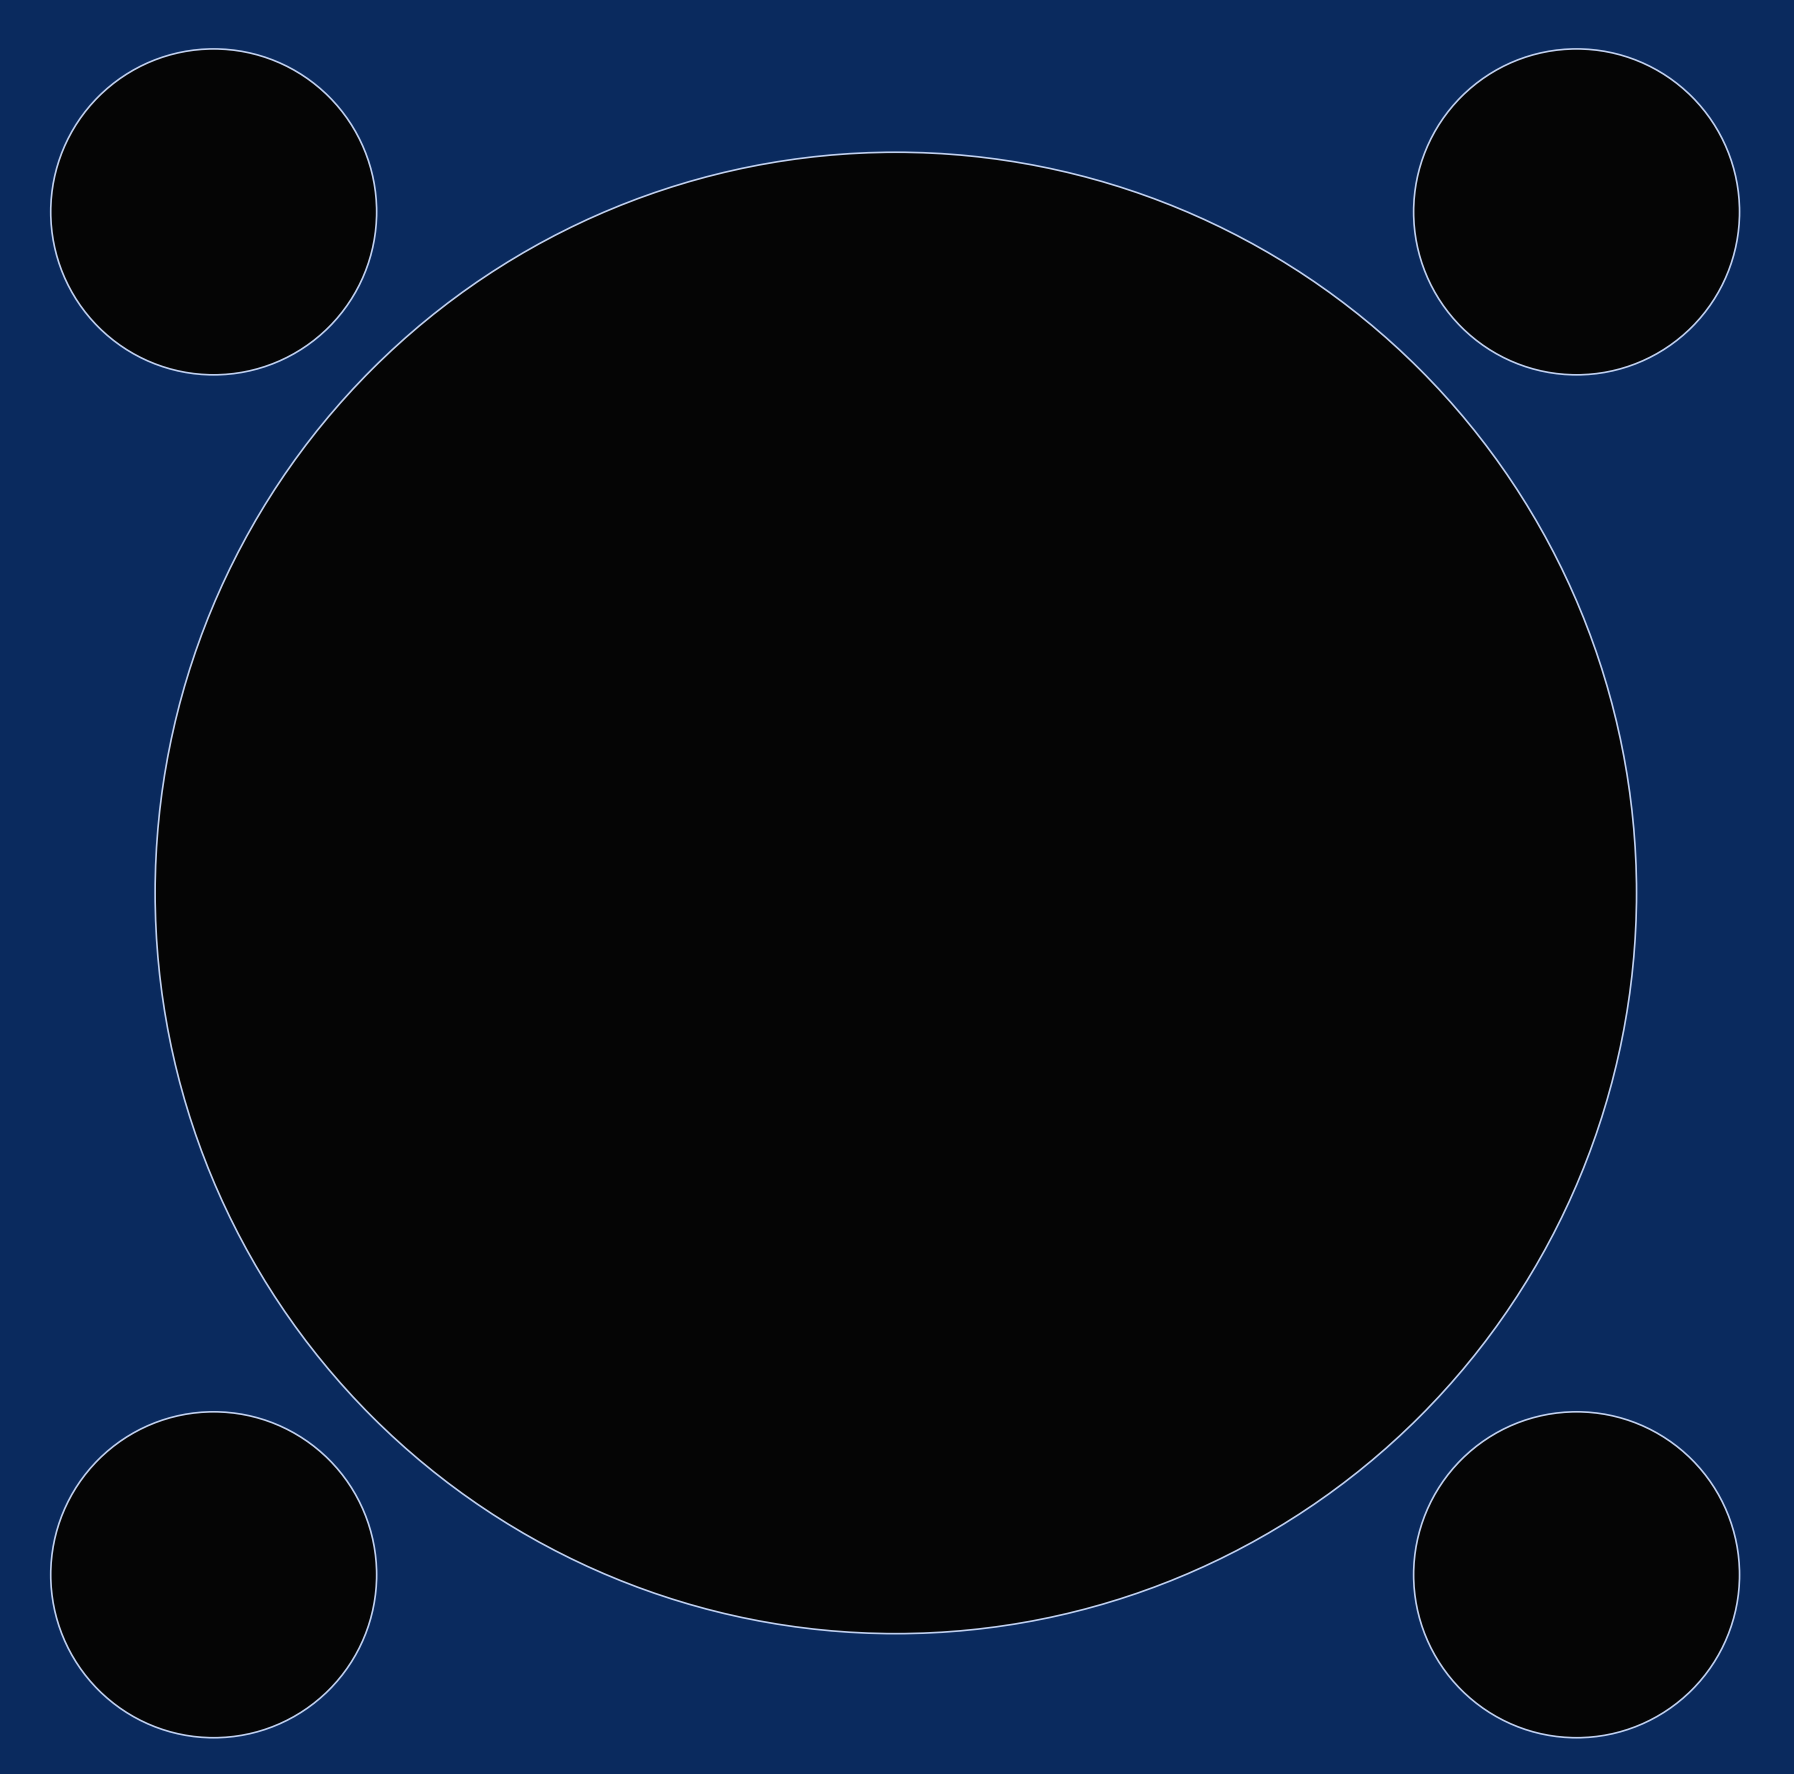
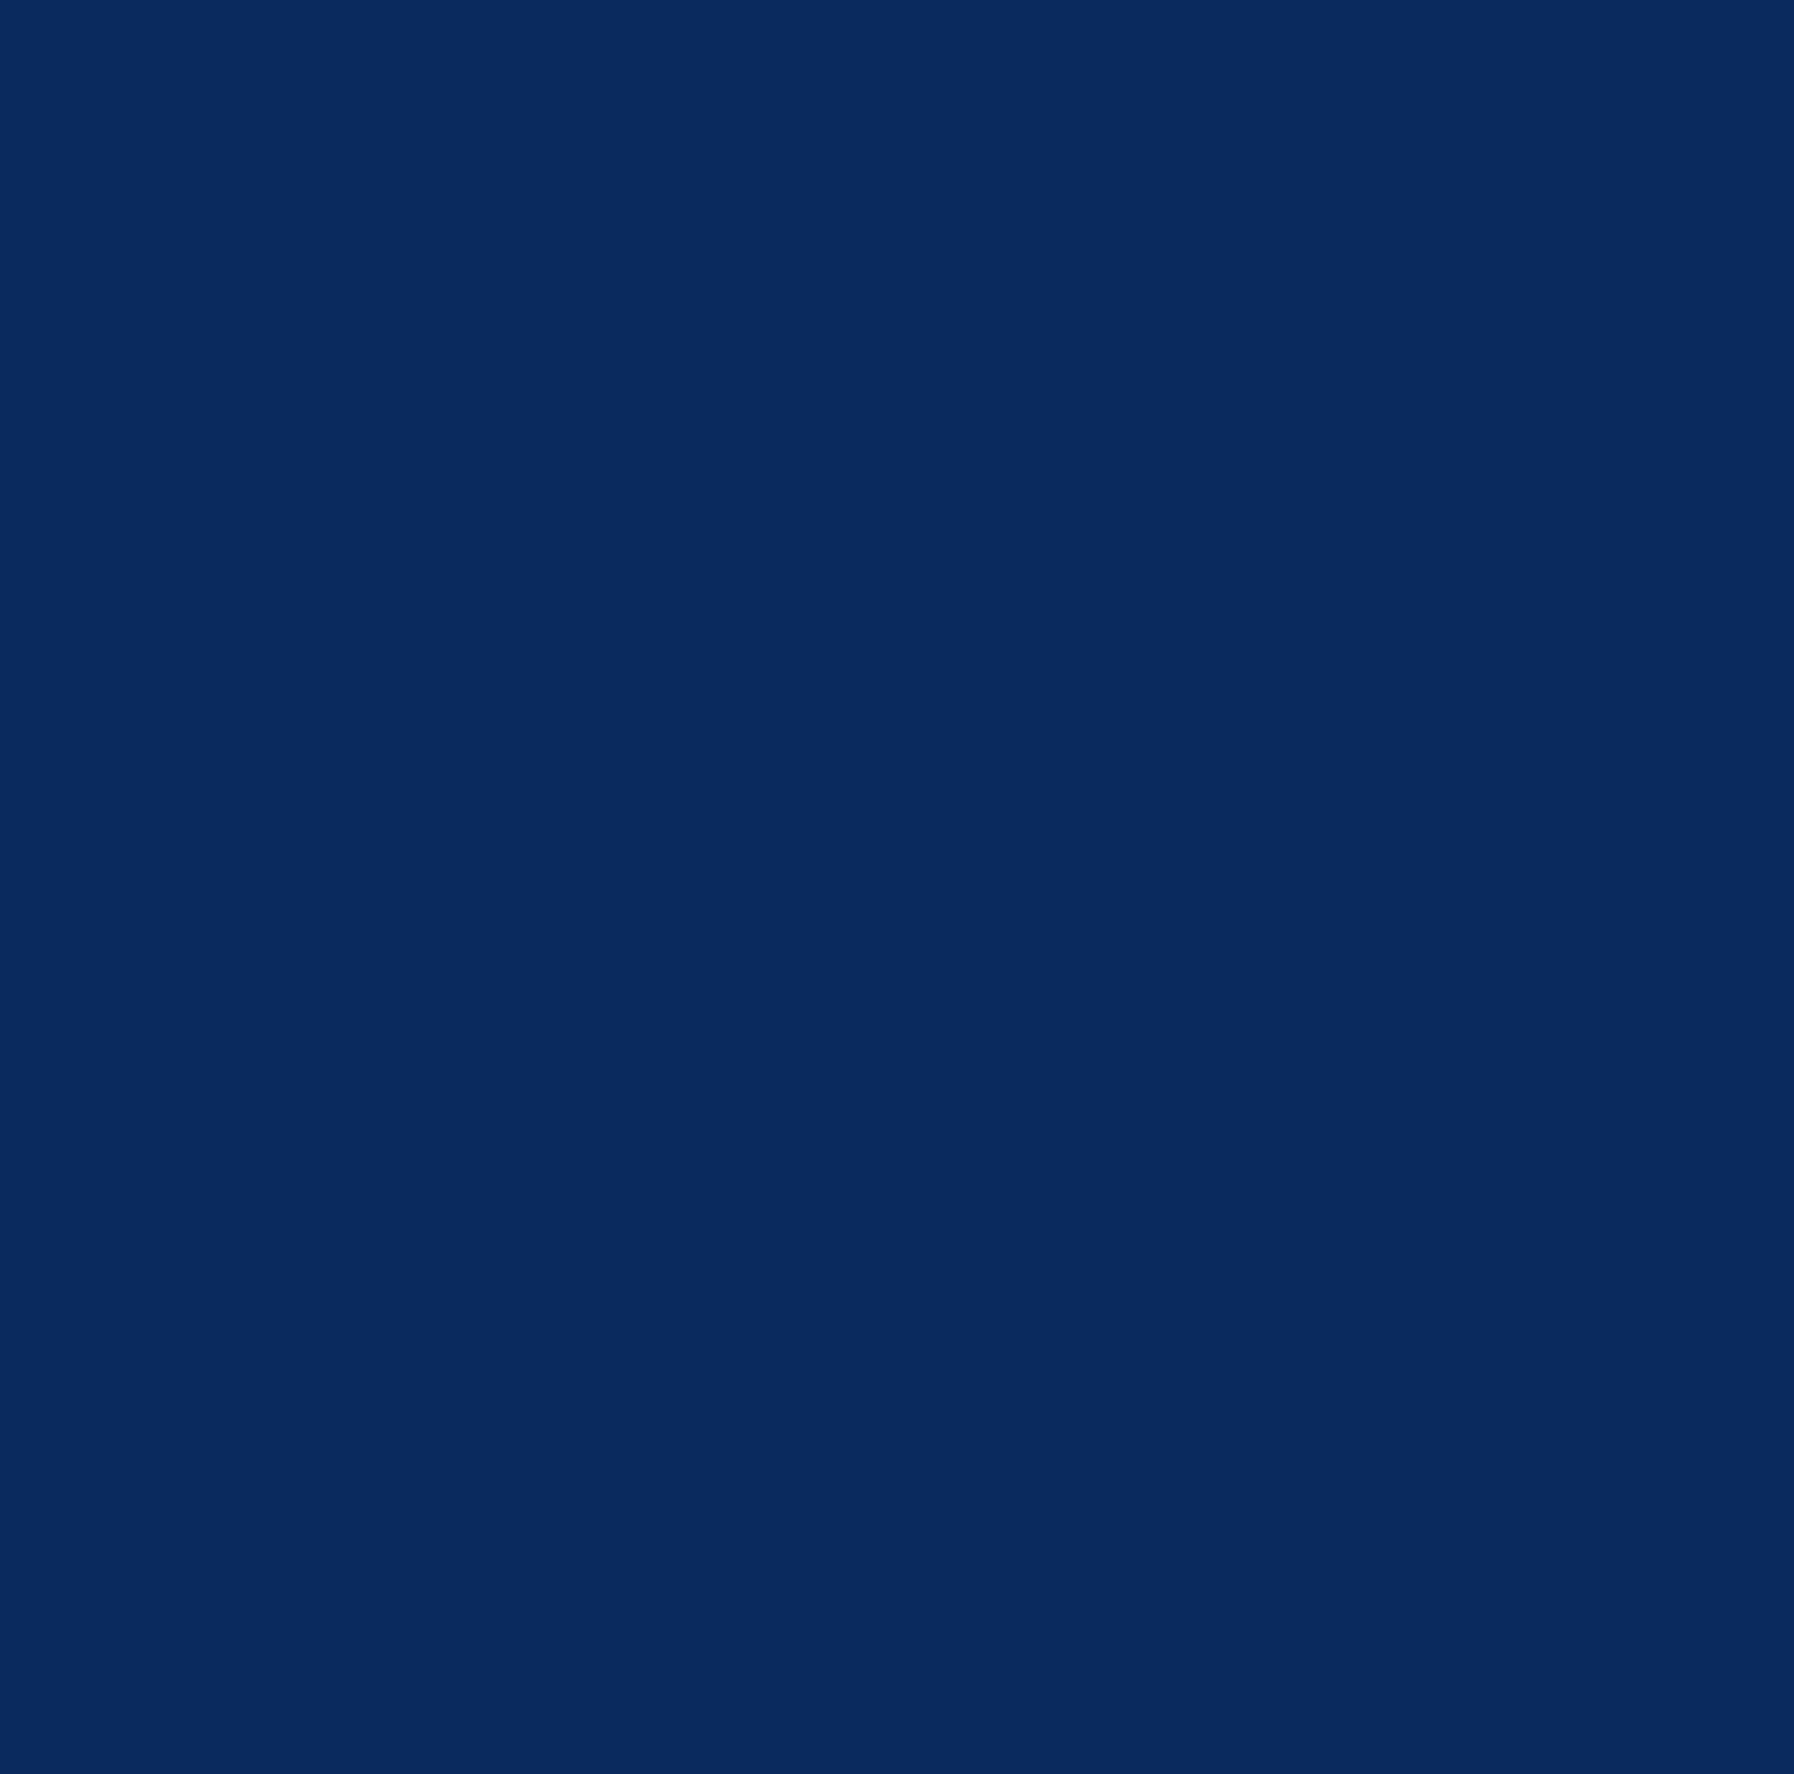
hole: (213, 211) -> none
hole: (1576, 211) -> none
hole: (895, 892) -> none
hole: (213, 1574) -> none
hole: (1576, 1574) -> none

